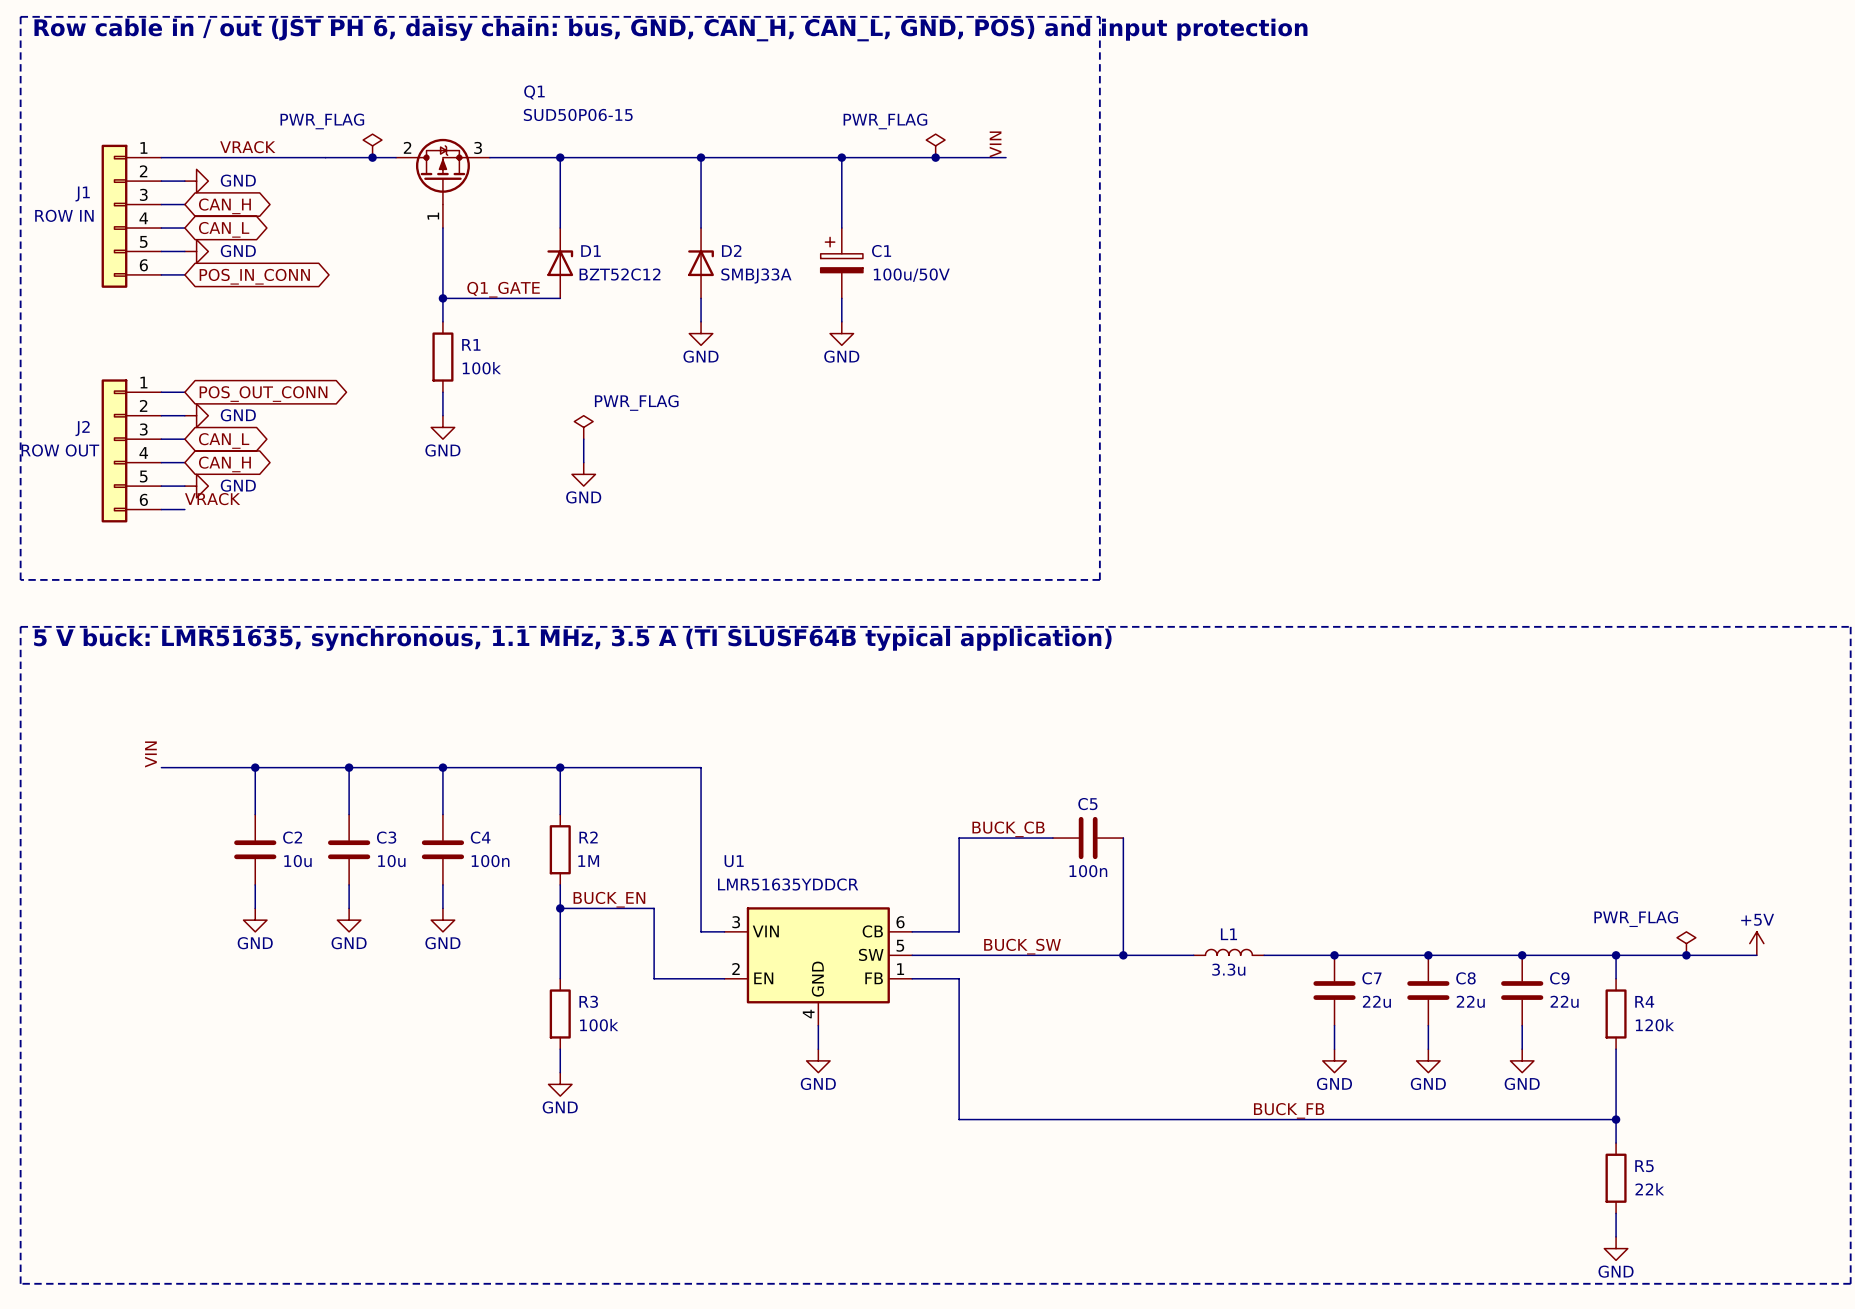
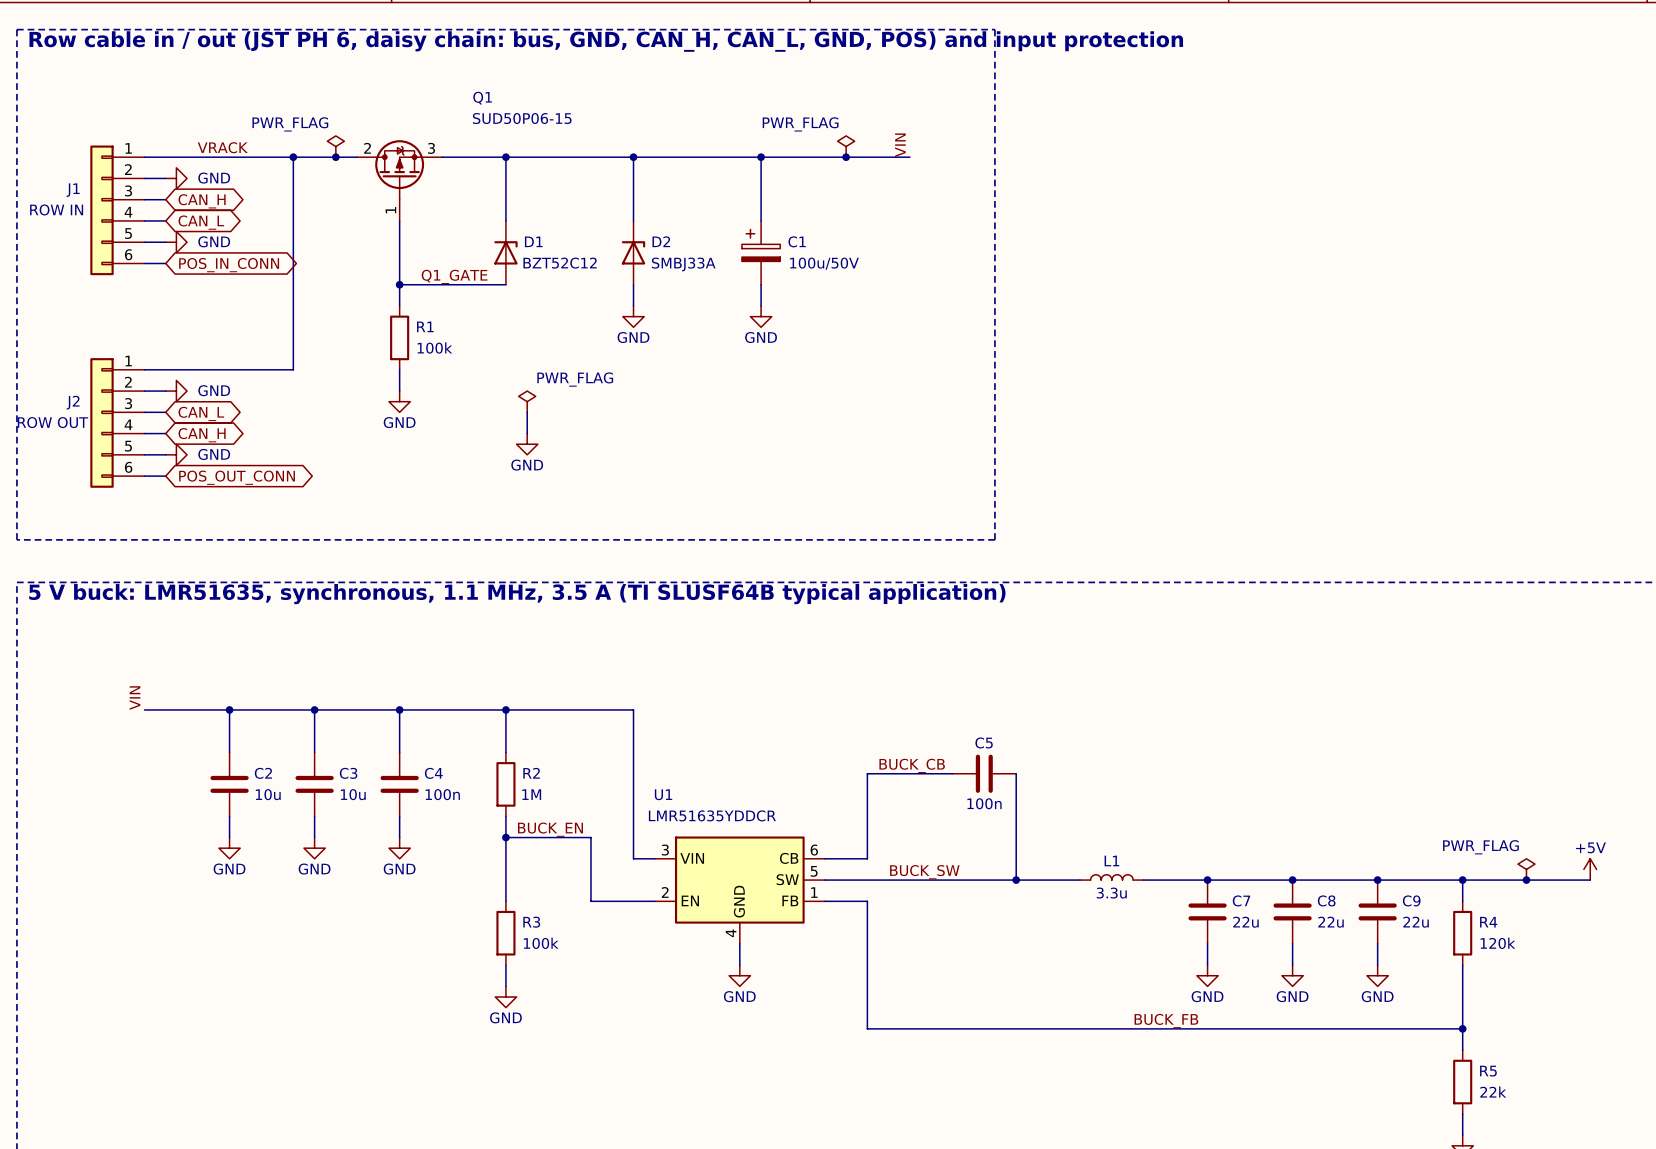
wire: none -> (293, 157) (293, 369) (165, 369)
junction: none -> (293, 157)
global label position: POS_OUT_CONN (263, 394) -> POS_OUT_CONN (237, 477)
label: VRACK (212, 499) -> none

